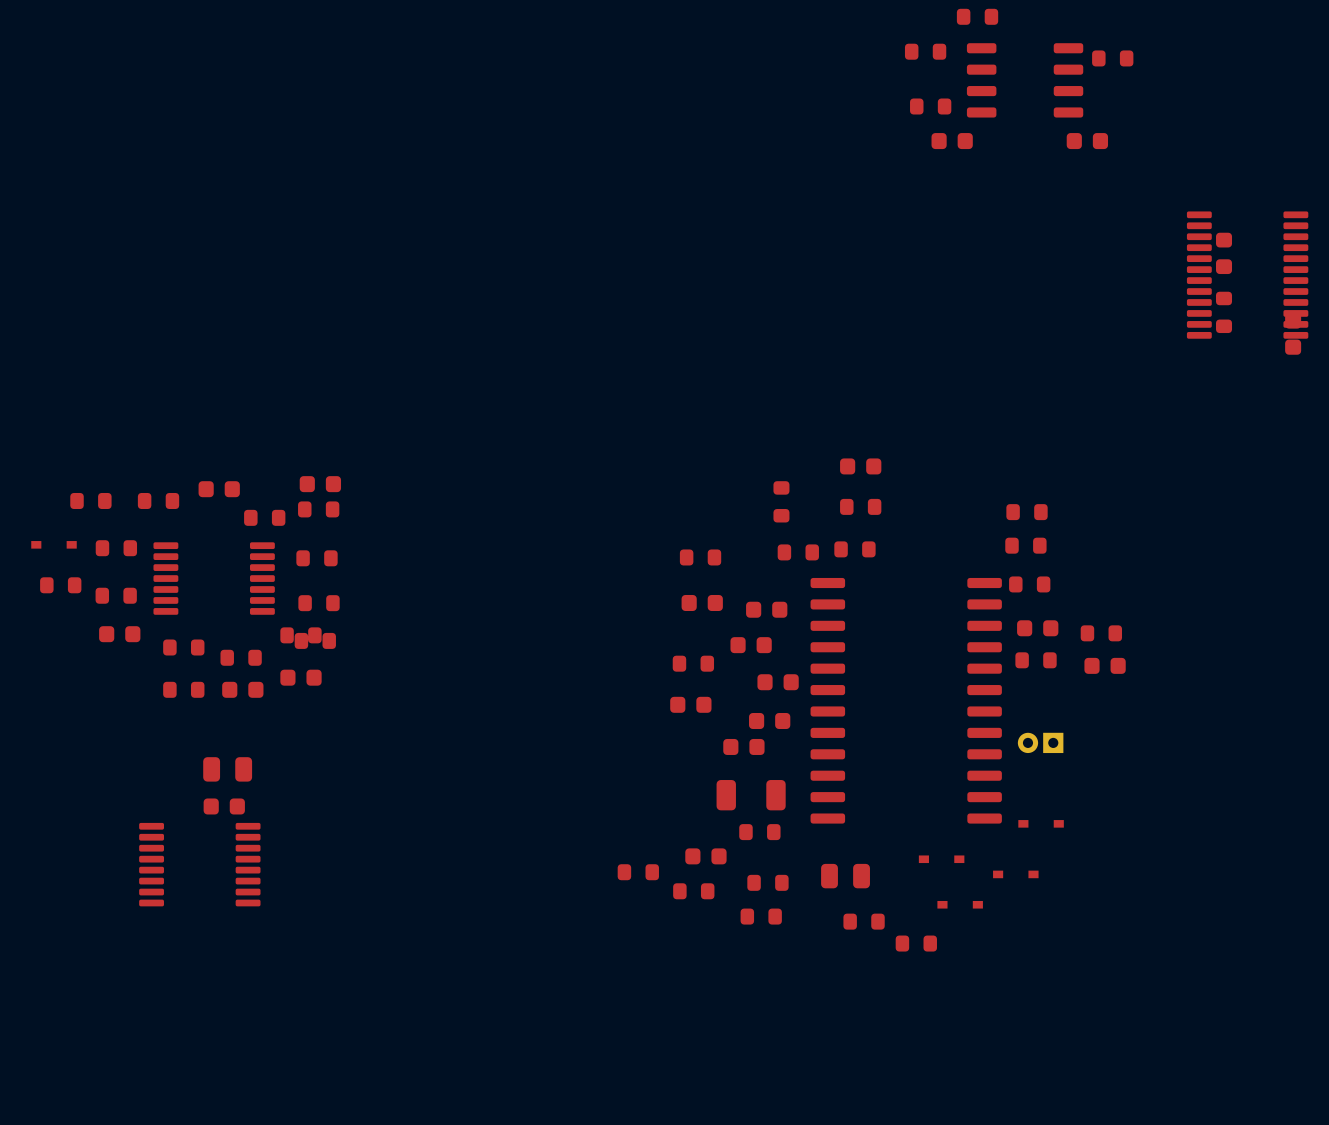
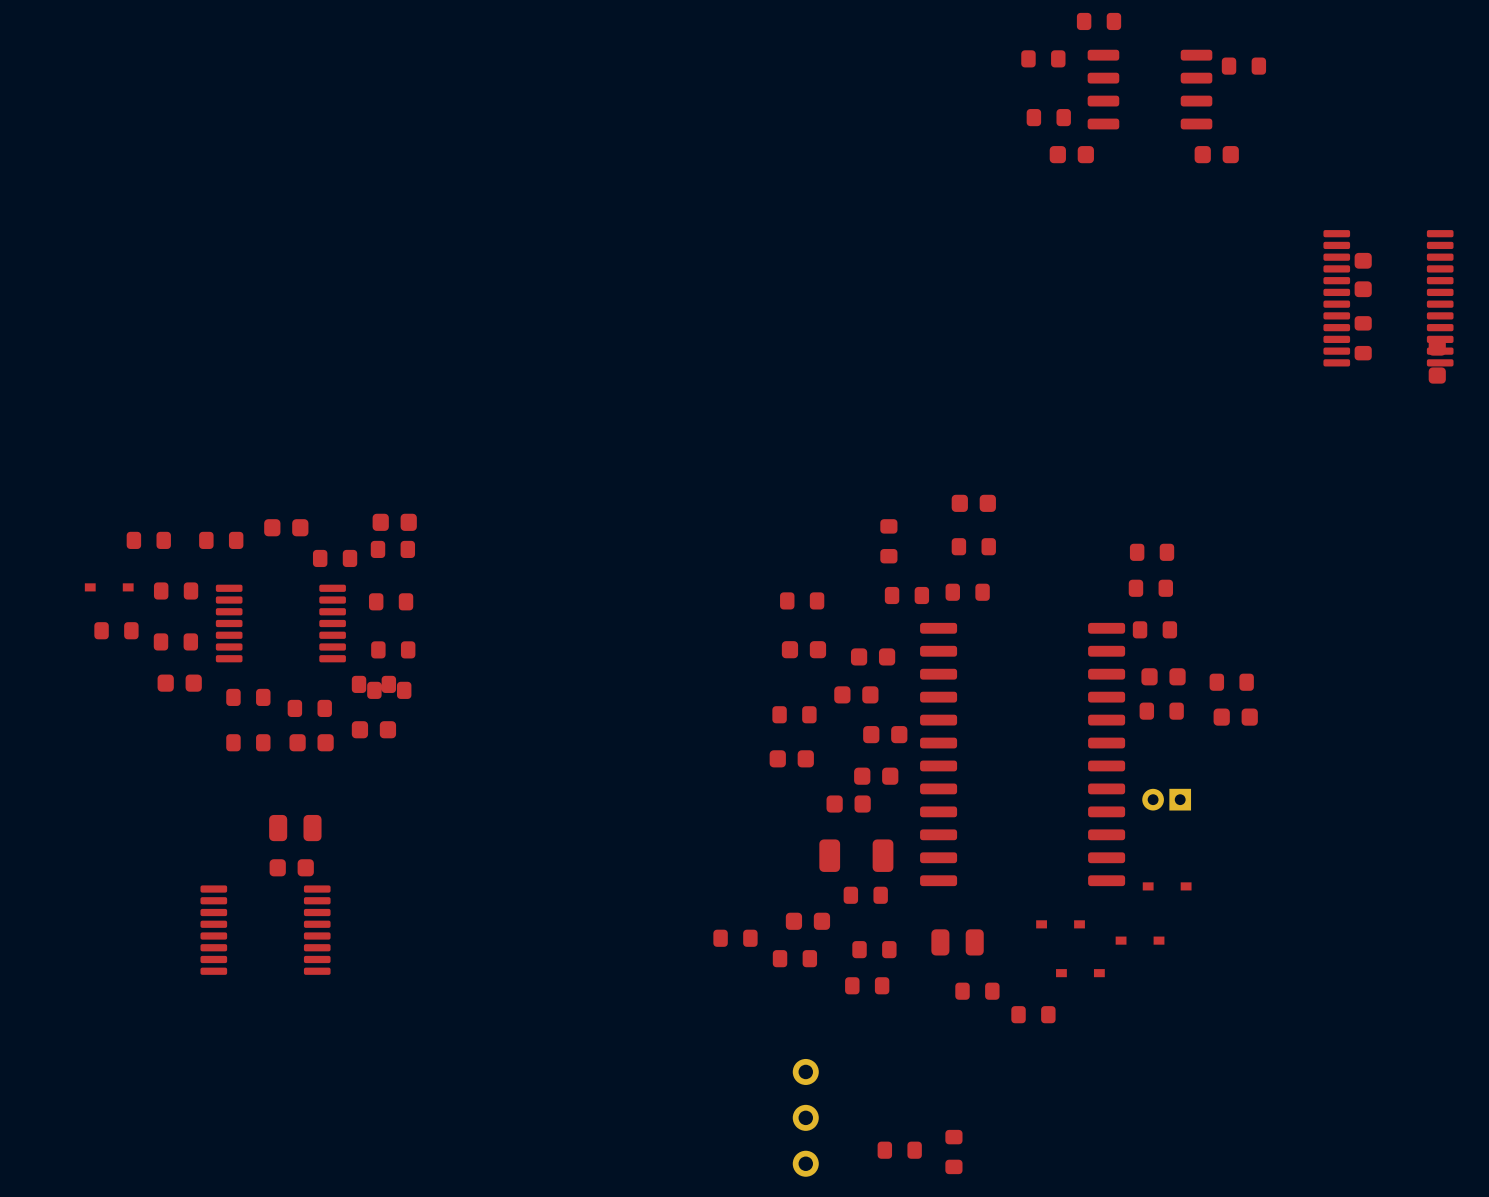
part: none -> (805, 1117)
part: none -> (899, 1150)
part: none -> (953, 1152)

